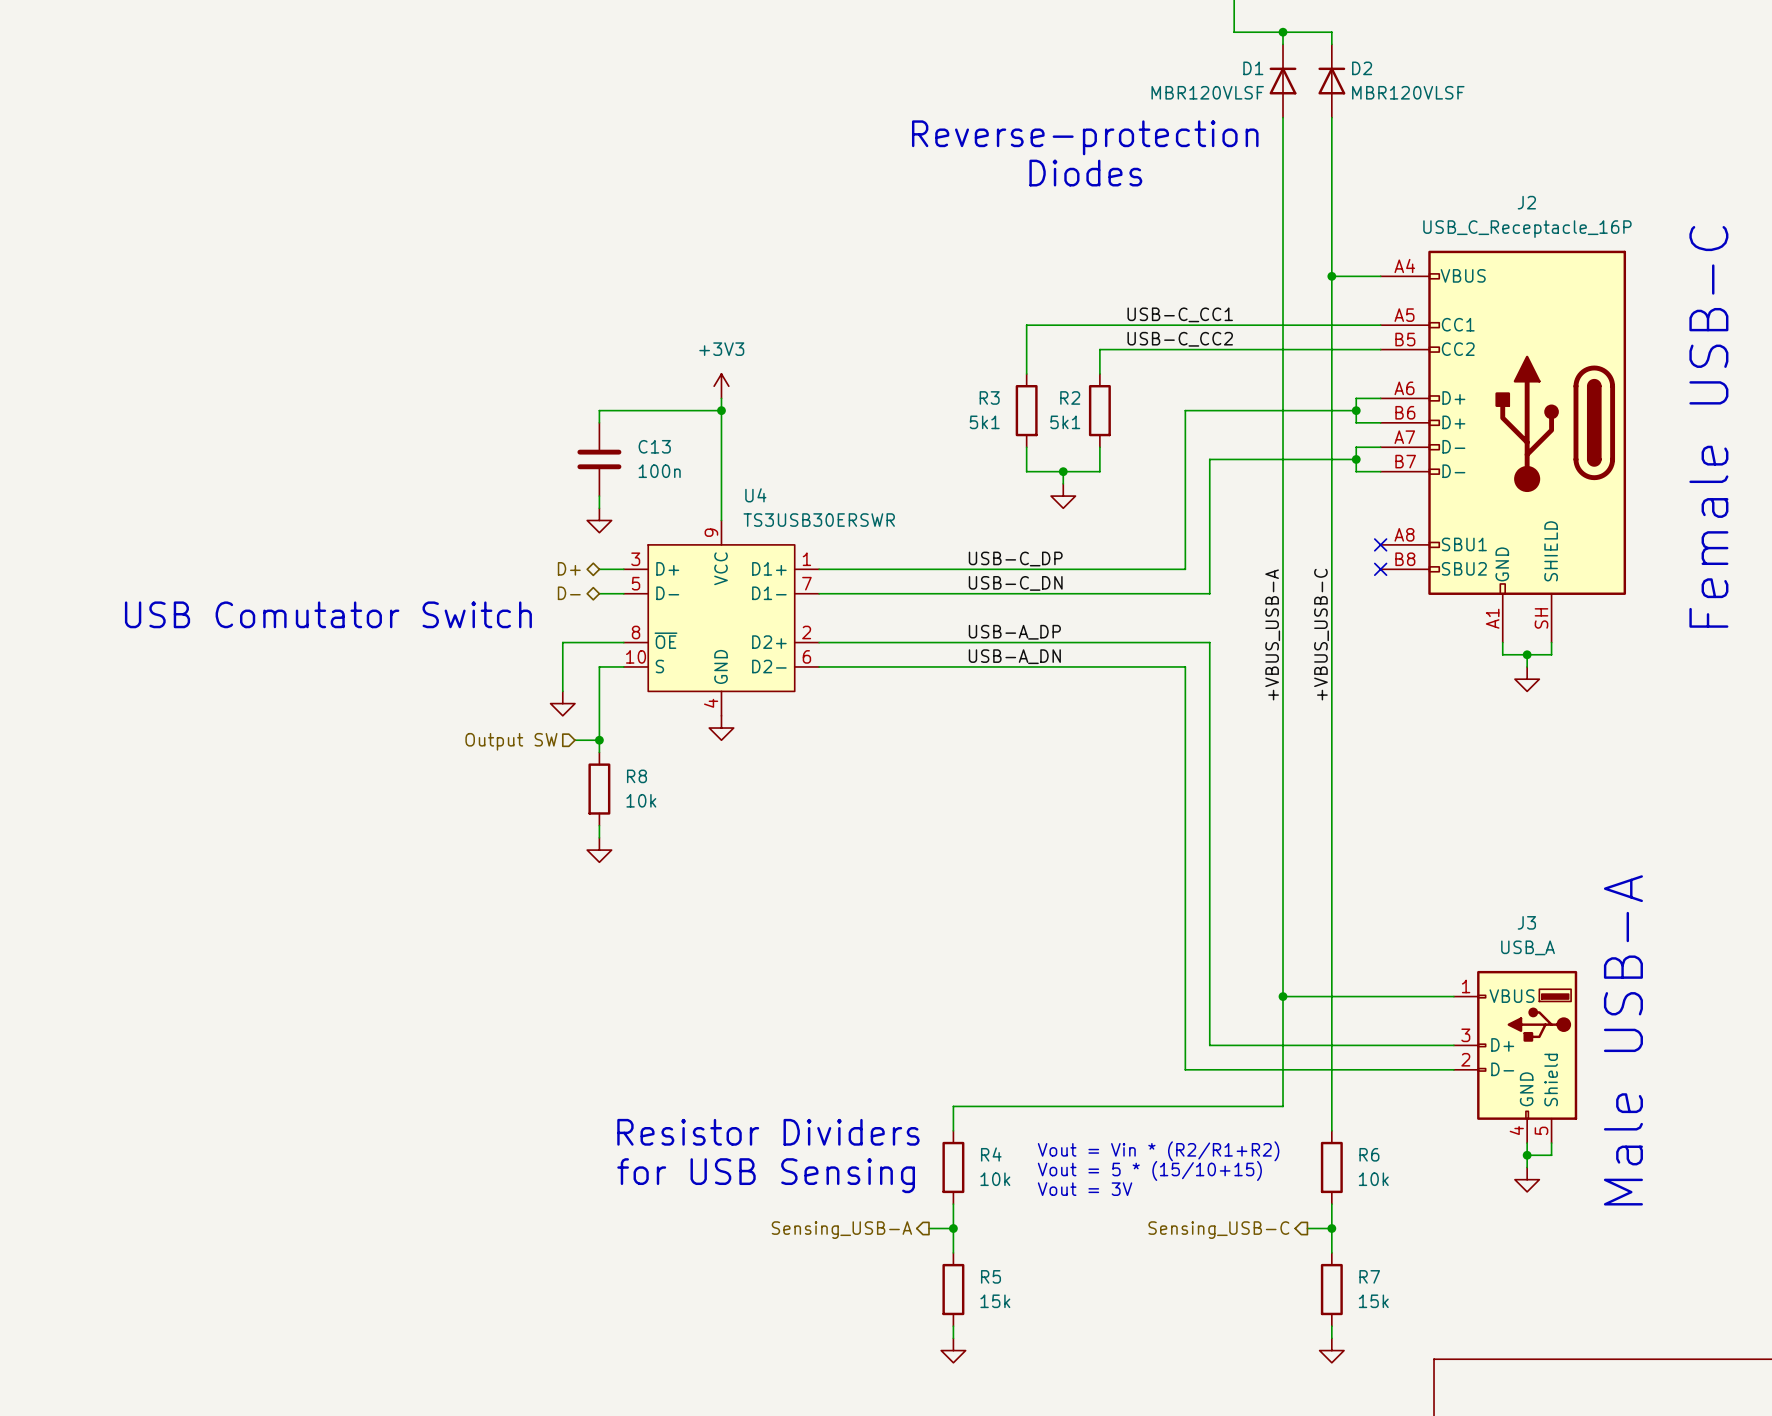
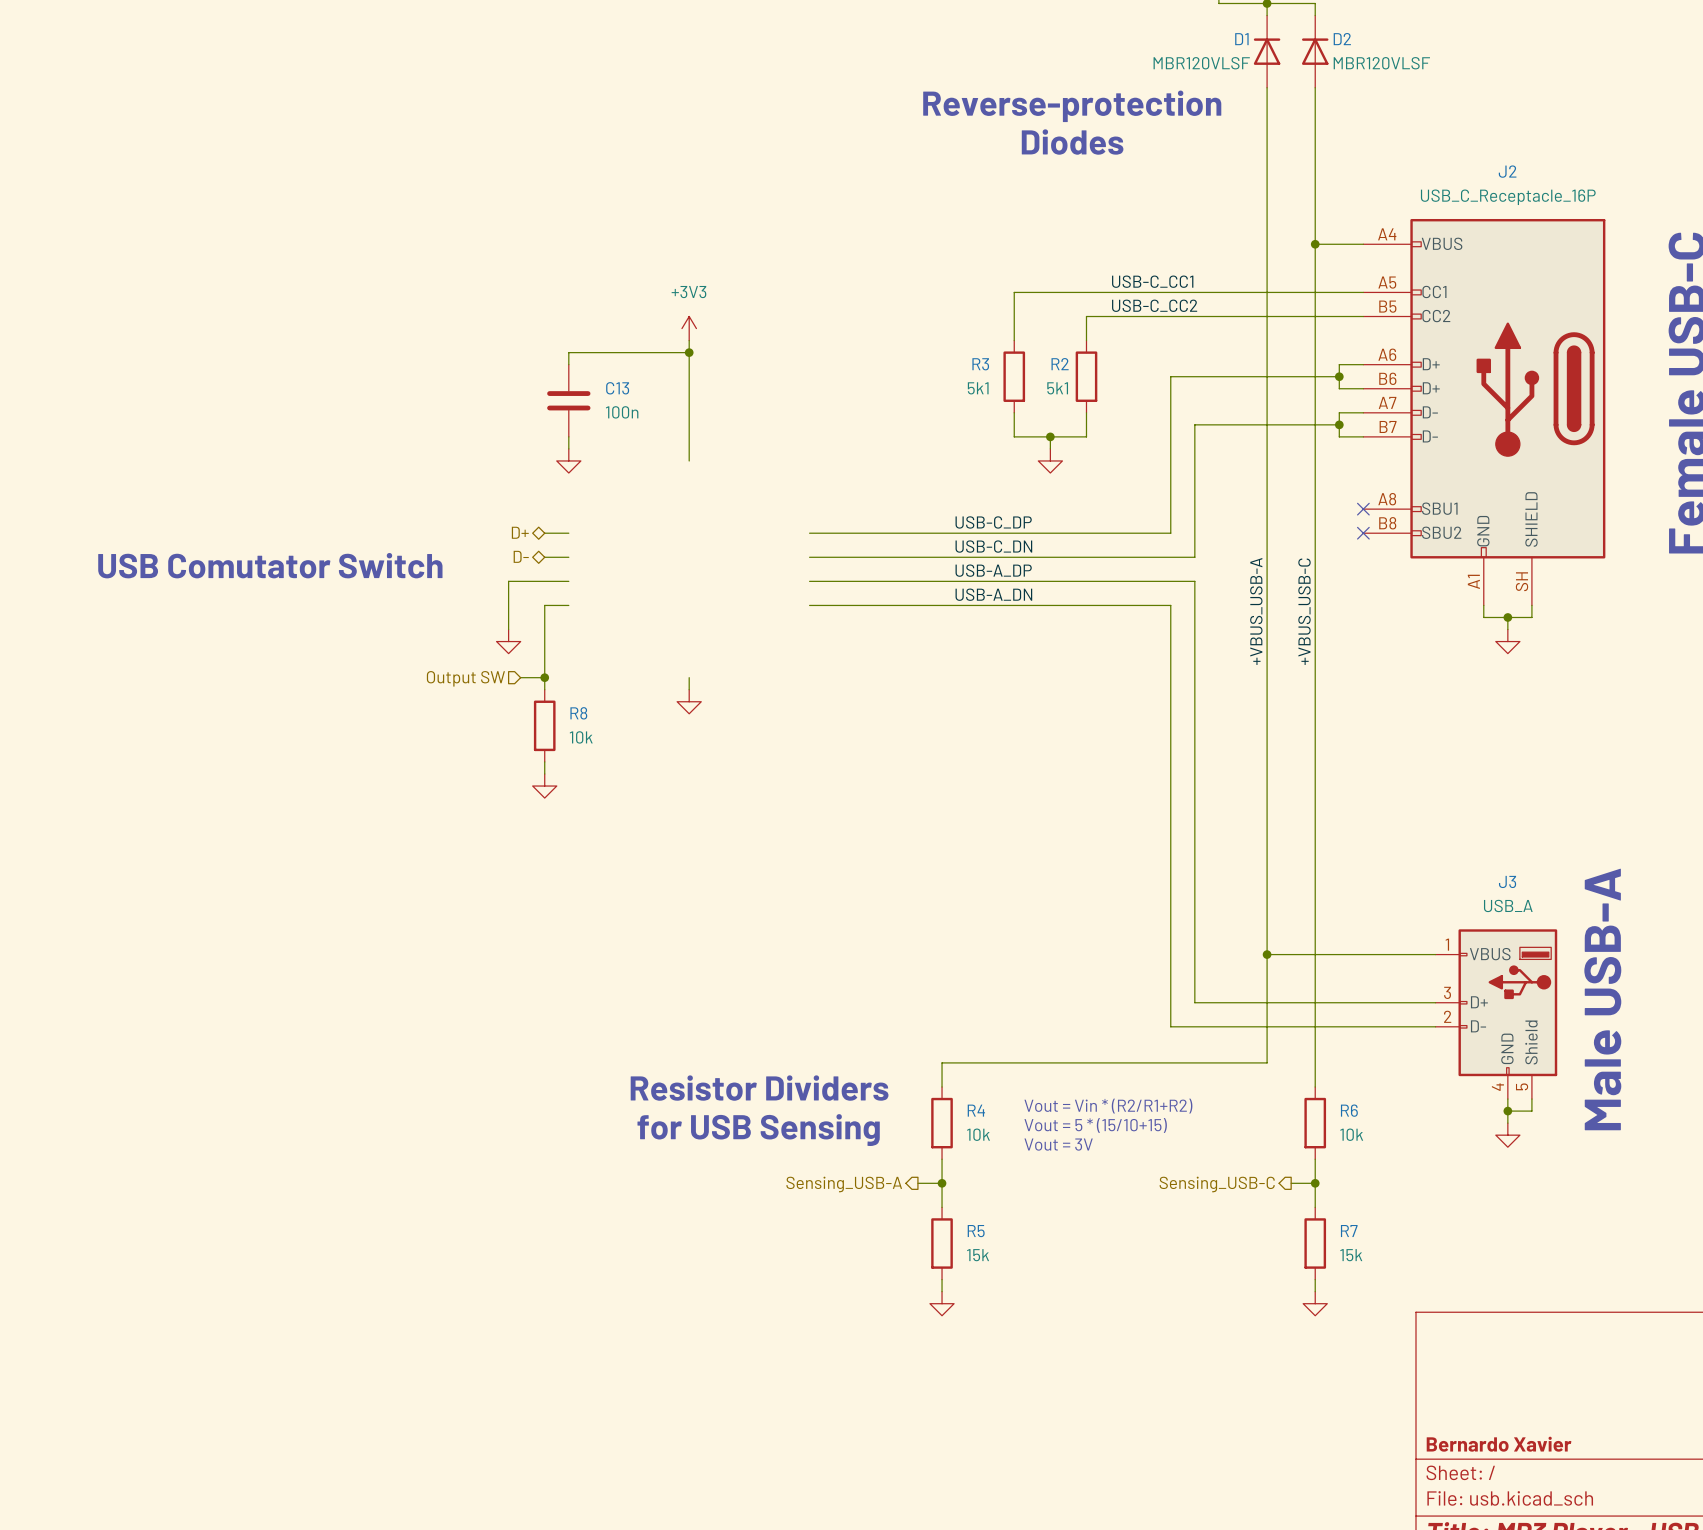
power symbol position: +3V3 (721, 386) -> +3V3 (689, 328)
wire: (721, 398) (721, 520) -> (689, 340) (689, 460)
wire: (721, 410) (599, 410) (599, 422) -> (689, 352) (568, 352) (568, 364)
junction position: (721, 410) -> (689, 352)
C13 position: (599, 459) -> (568, 400)
wire: (599, 496) (599, 508) -> (568, 436) (568, 448)
power symbol position: (599, 520) -> (568, 460)
hierarchical label position: D+ (569, 568) -> D+ (520, 532)
wire: (599, 569) (623, 569) -> (544, 557) (568, 557)
hierarchical label position: D- (569, 593) -> D- (521, 556)
wire: (599, 593) (623, 593) -> (544, 533) (568, 533)
label: none -> USB-A_DP (993, 570)
text position: USB Comutator Switch (328, 614) -> USB Comutator Switch (270, 565)
wire: none -> (568, 581) (508, 581) (508, 629)
U4: TS3USB30ERSWR (721, 618) -> none
wire: none -> (809, 581) (1194, 581) (1194, 605)
label: USB-A_DP (1014, 632) -> USB-A_DN (993, 594)
wire: (562, 642) (562, 691) -> (556, 605) (544, 605) (544, 689)
wire: (574, 642) (623, 642) -> none
wire: (1185, 642) (1209, 642) -> (1170, 605) (1170, 629)
label: USB-A_DN (1014, 656) -> none
wire: (623, 666) (599, 666) (599, 752) -> none
wire: (819, 666) (1185, 666) -> none
power symbol position: (562, 703) -> (508, 641)
wire: none -> (689, 677) (689, 689)
power symbol position: (721, 728) -> (689, 701)
wire: (574, 740) (599, 740) -> (520, 677) (544, 677)
junction position: (599, 740) -> (544, 677)
hierarchical label position: Output SW (511, 741) -> Output SW (465, 678)
R8 position: (599, 789) -> (544, 725)
wire: (599, 825) (599, 837) -> (544, 761) (544, 773)
power symbol position: (599, 850) -> (544, 786)

